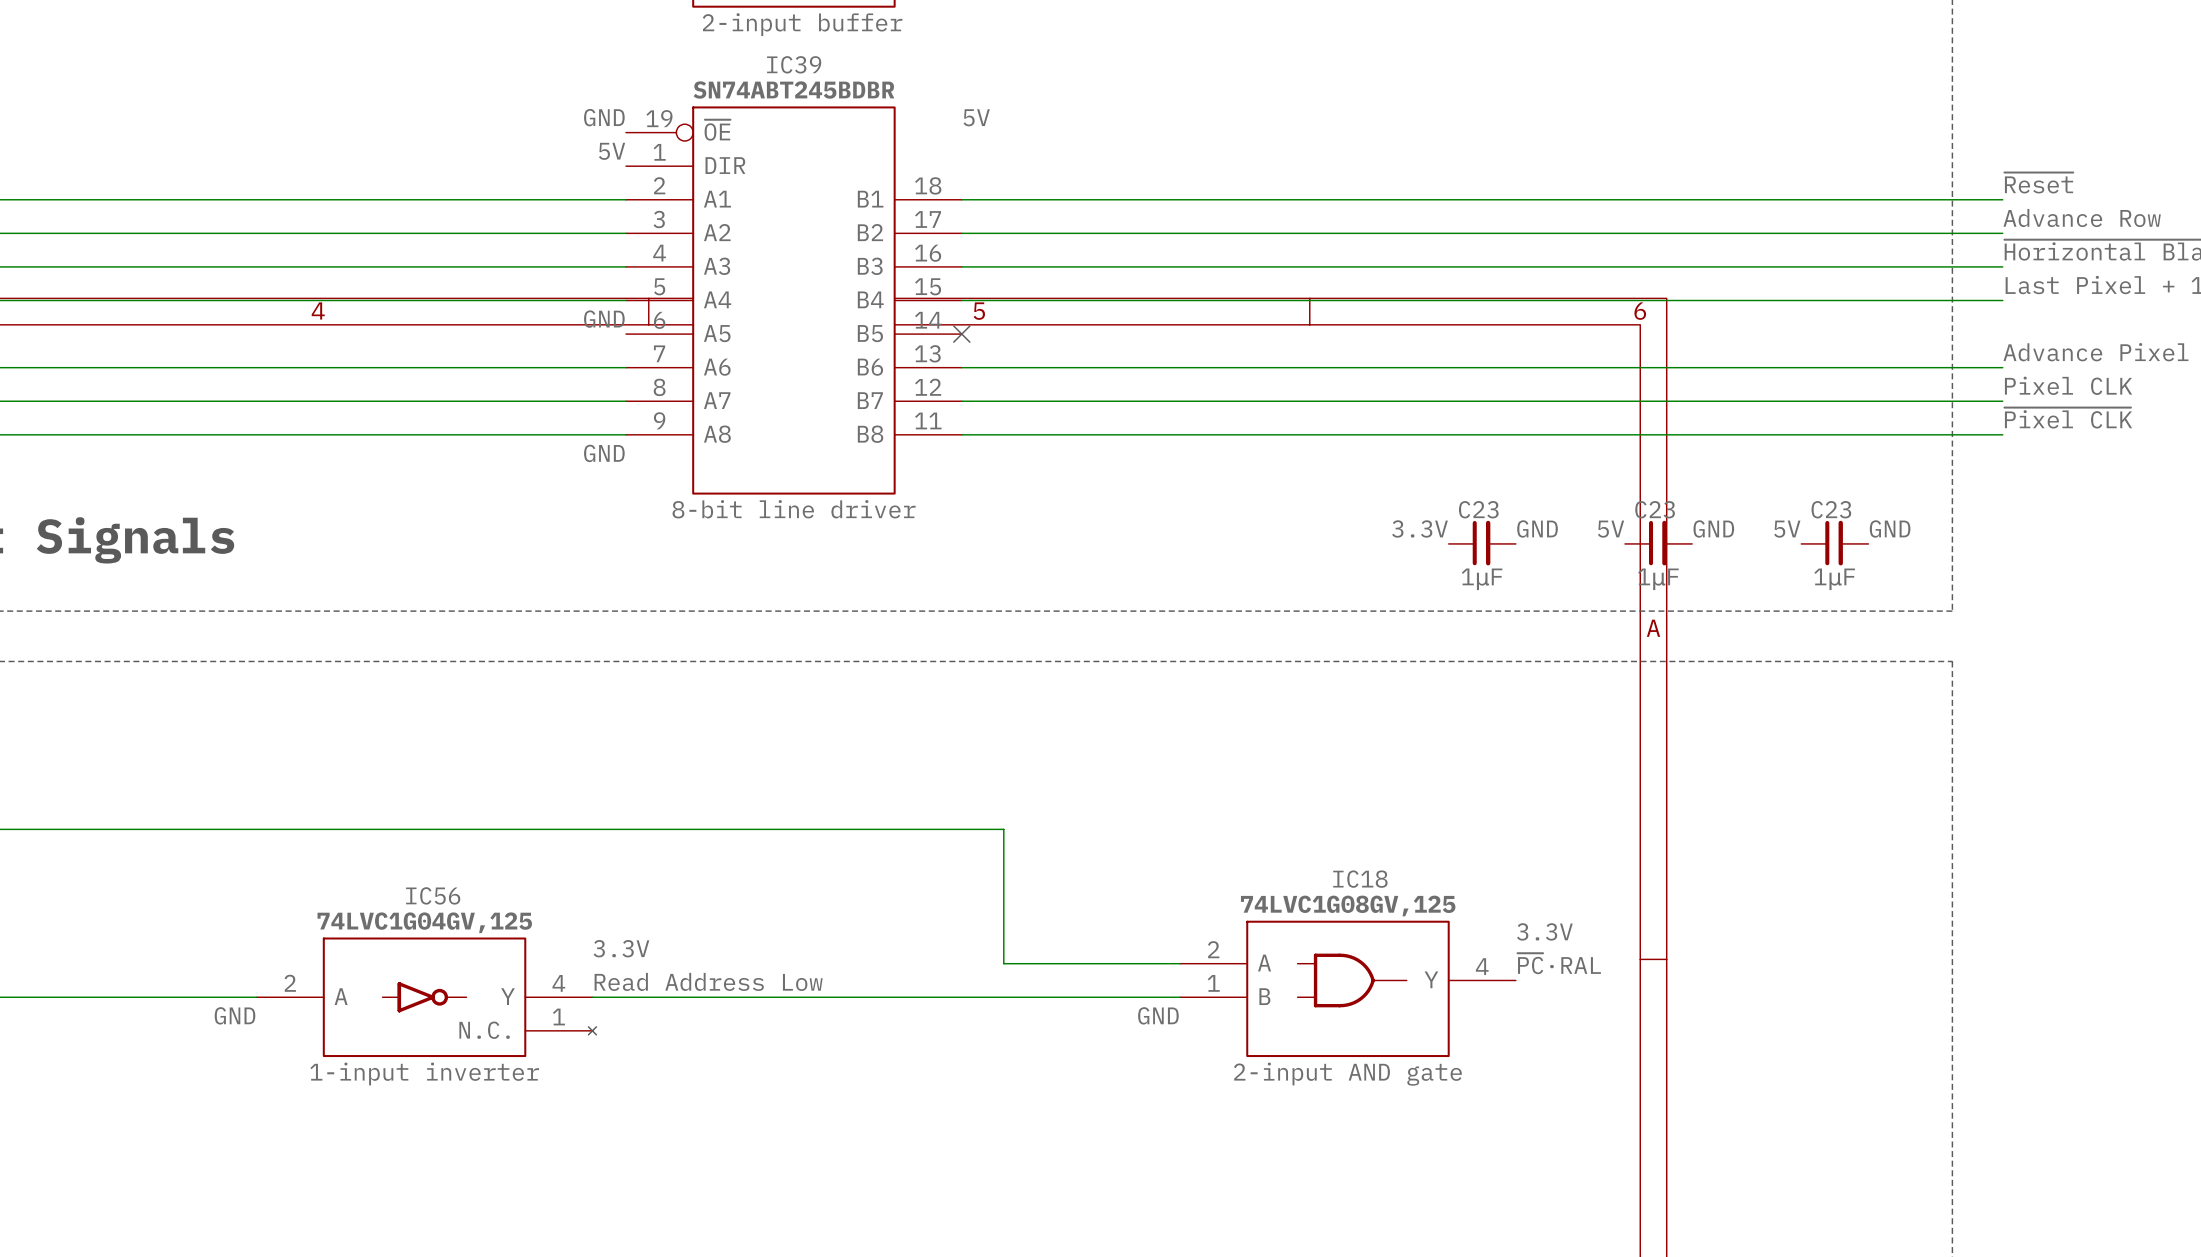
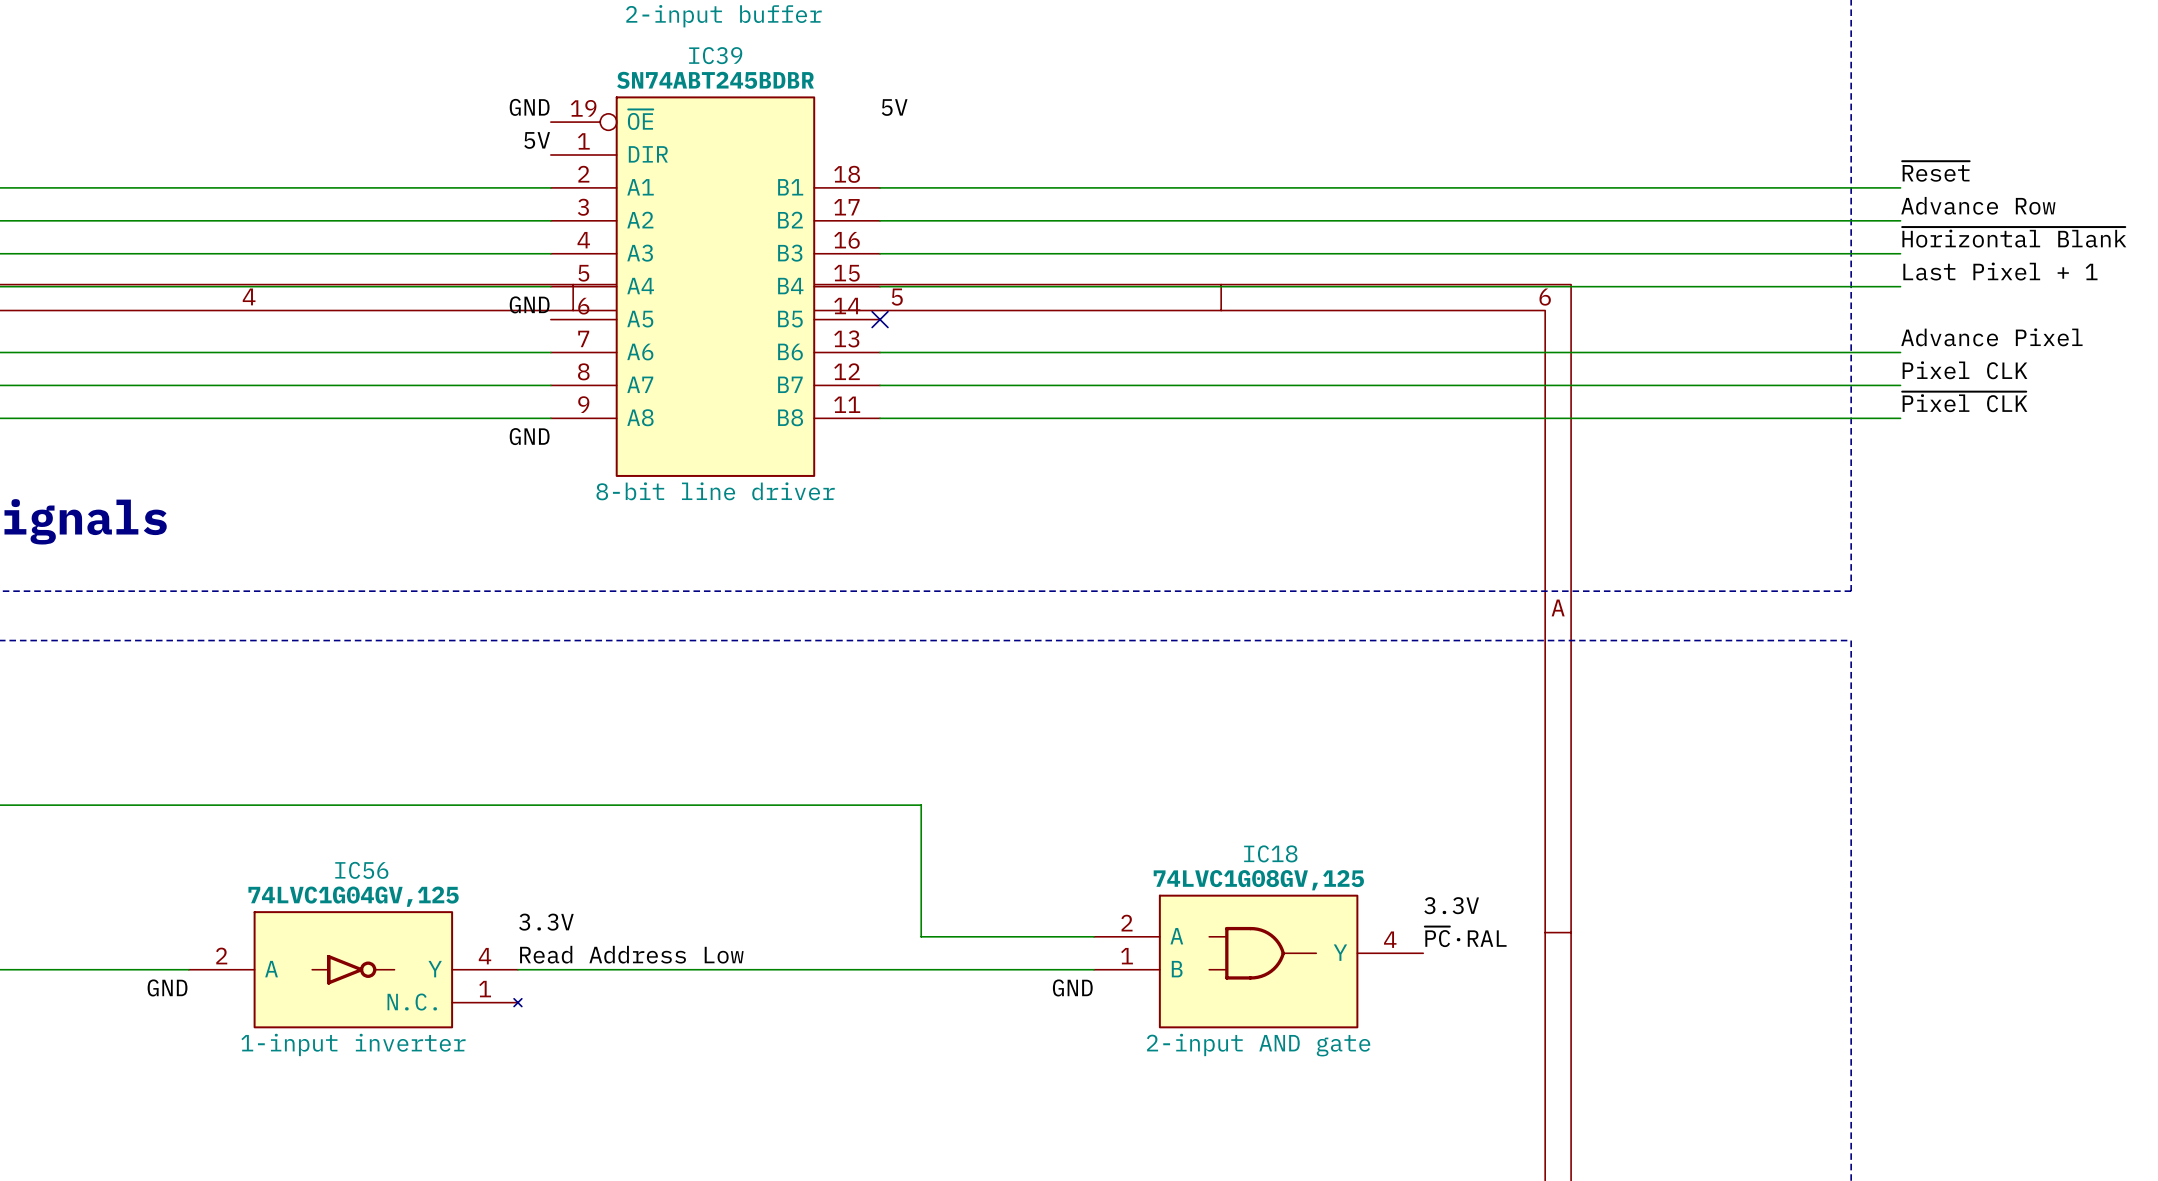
label: 3.3V (1419, 528) -> none
label: GND (1537, 528) -> none
label: GND (1713, 528) -> none
label: GND (1890, 528) -> none
label: 5V (1611, 529) -> none
label: 5V (1787, 529) -> none
C23: 1μF (1482, 543) -> none
C23: 1μF (1658, 543) -> none
C23: 1μF (1834, 543) -> none

